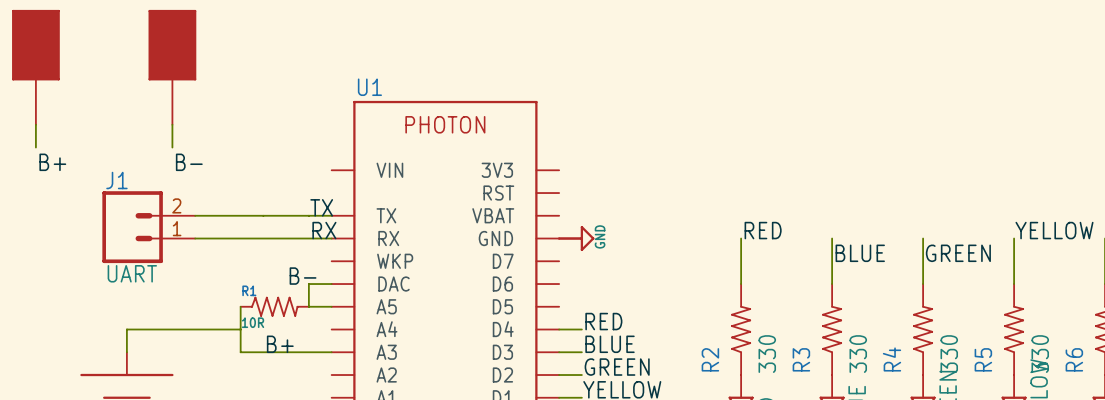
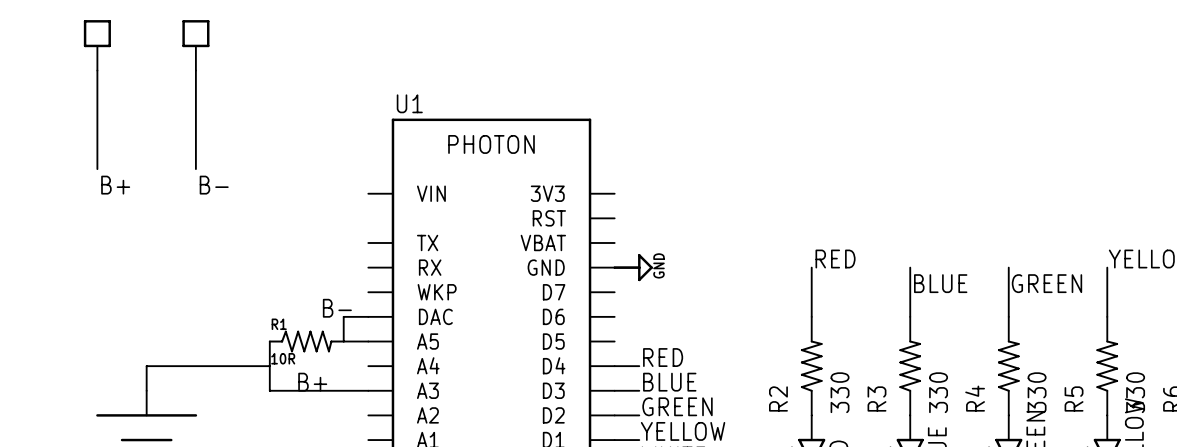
part: none -> (97, 45)
part: none -> (195, 45)
wire: none -> (97, 70) (97, 169)
part: (35, 67) -> none
part: (172, 67) -> none
wire: (35, 124) (35, 147) -> none
label position: B+ (52, 162) -> B+ (115, 185)
label: TX (321, 207) -> none
wire: (195, 215) (331, 215) -> none
J1: UART (148, 227) -> none
label: RX (324, 230) -> none
wire: (195, 238) (331, 238) -> none

